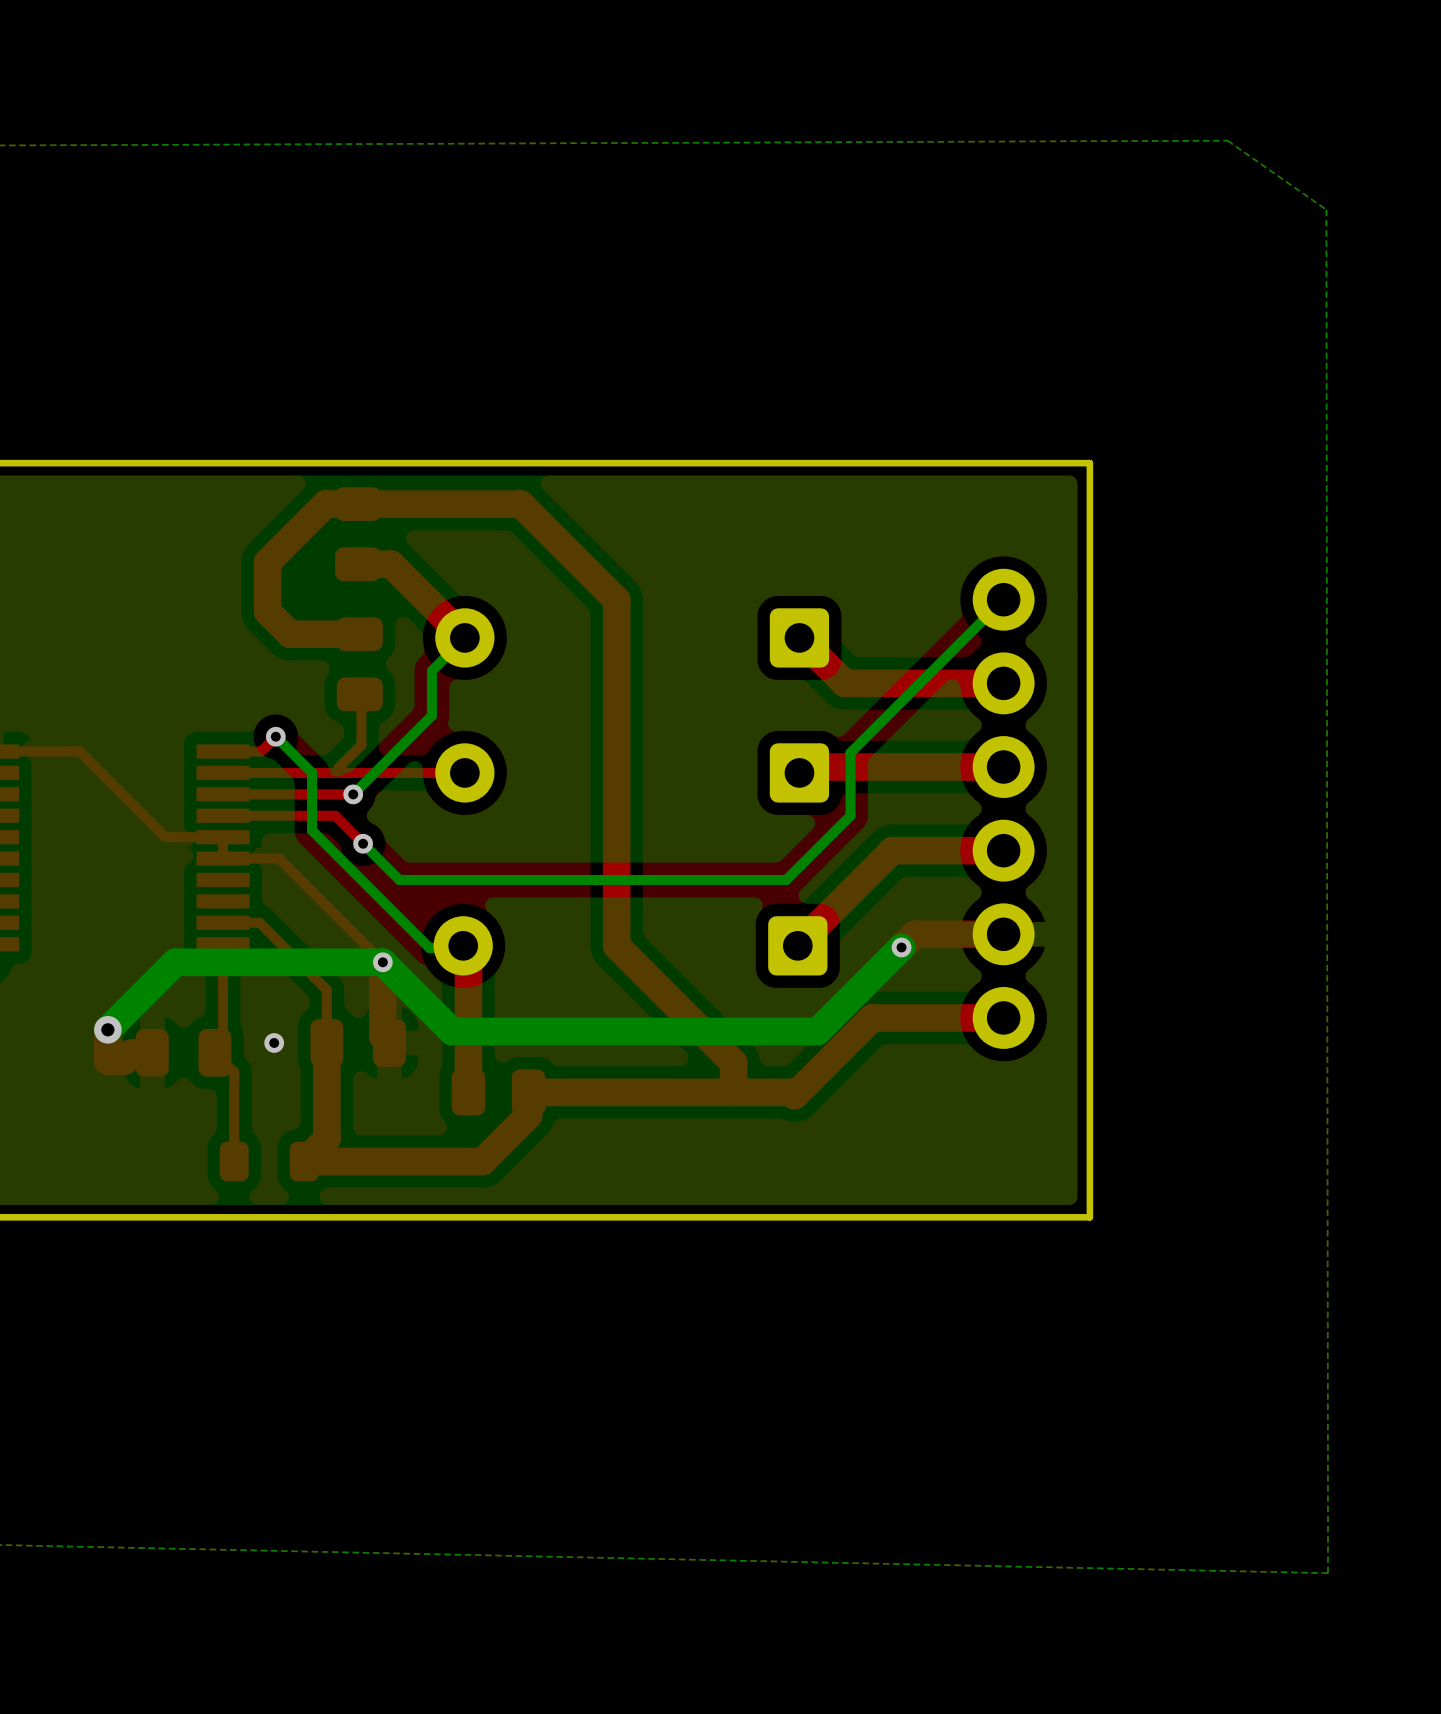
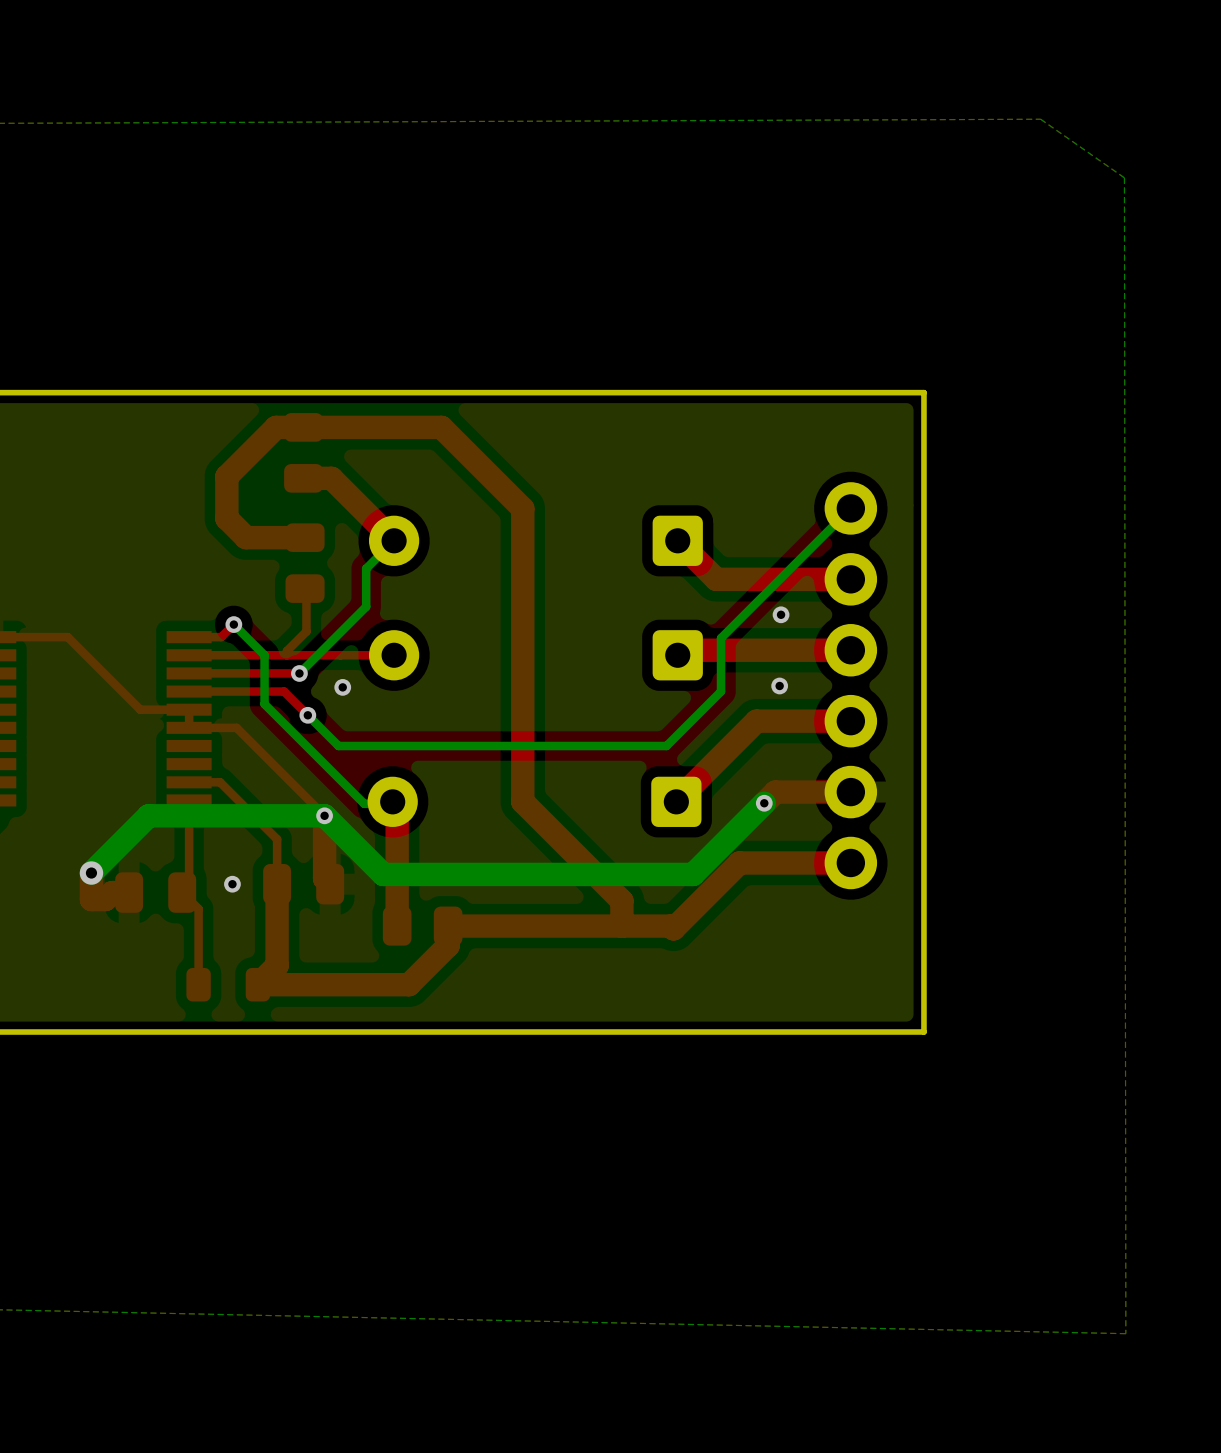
via: none -> (781, 614)
via: none -> (779, 685)
via: none -> (342, 687)

